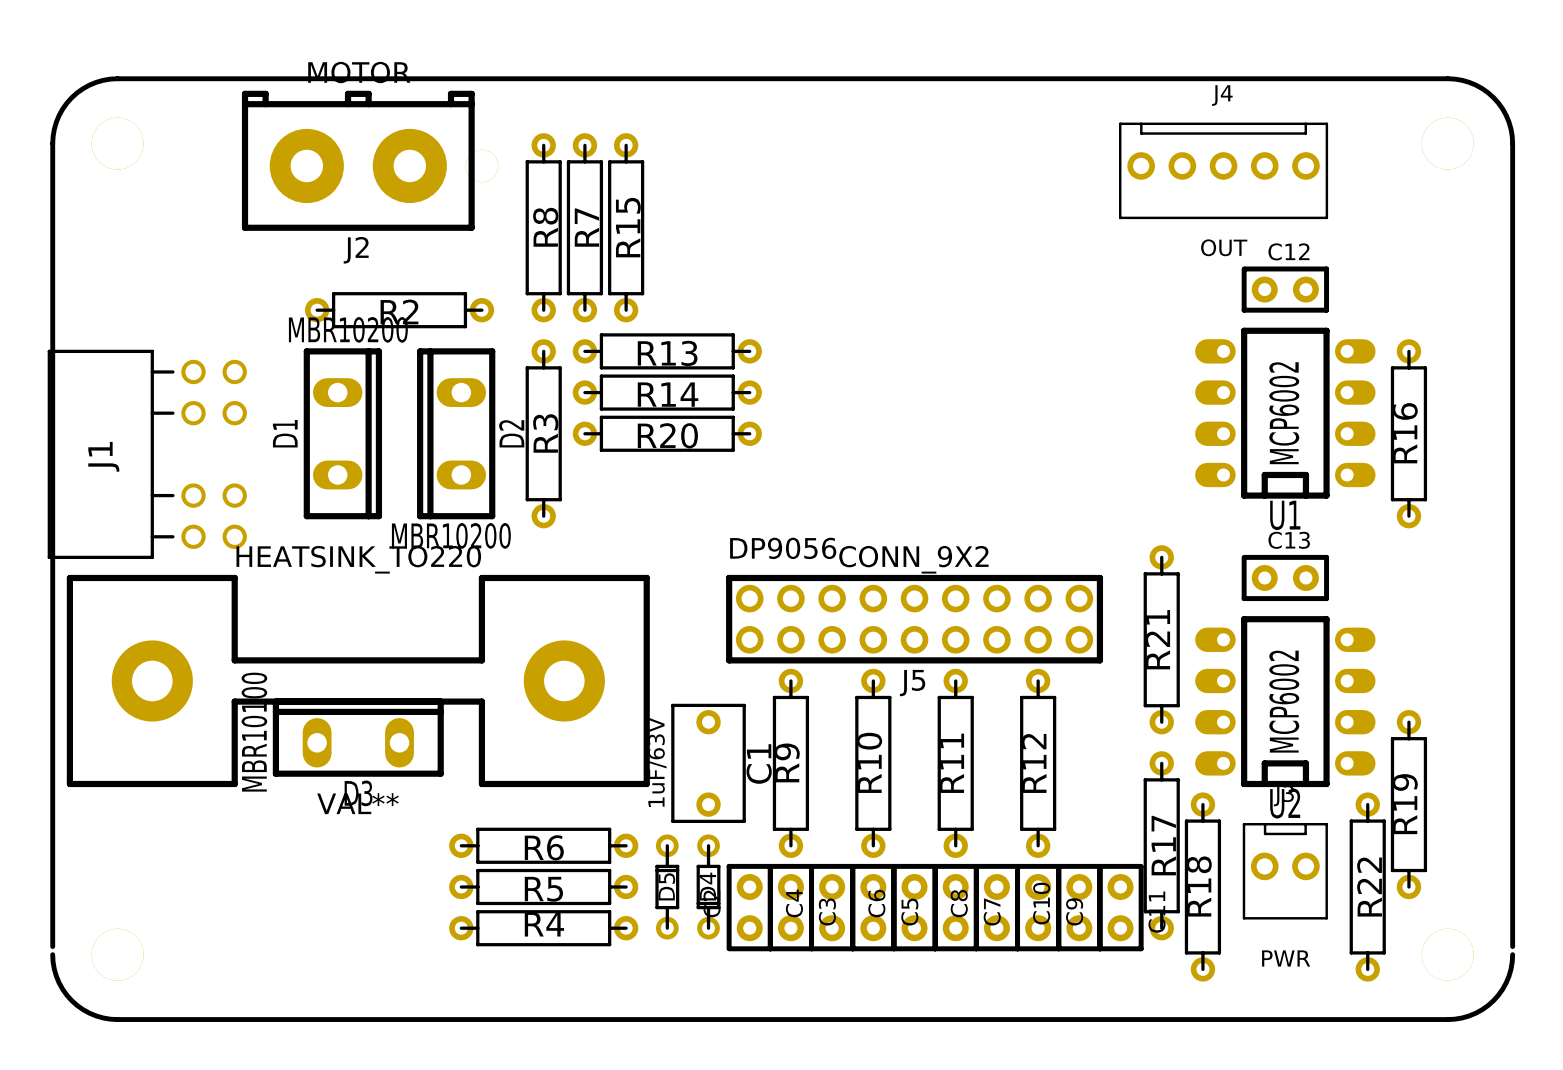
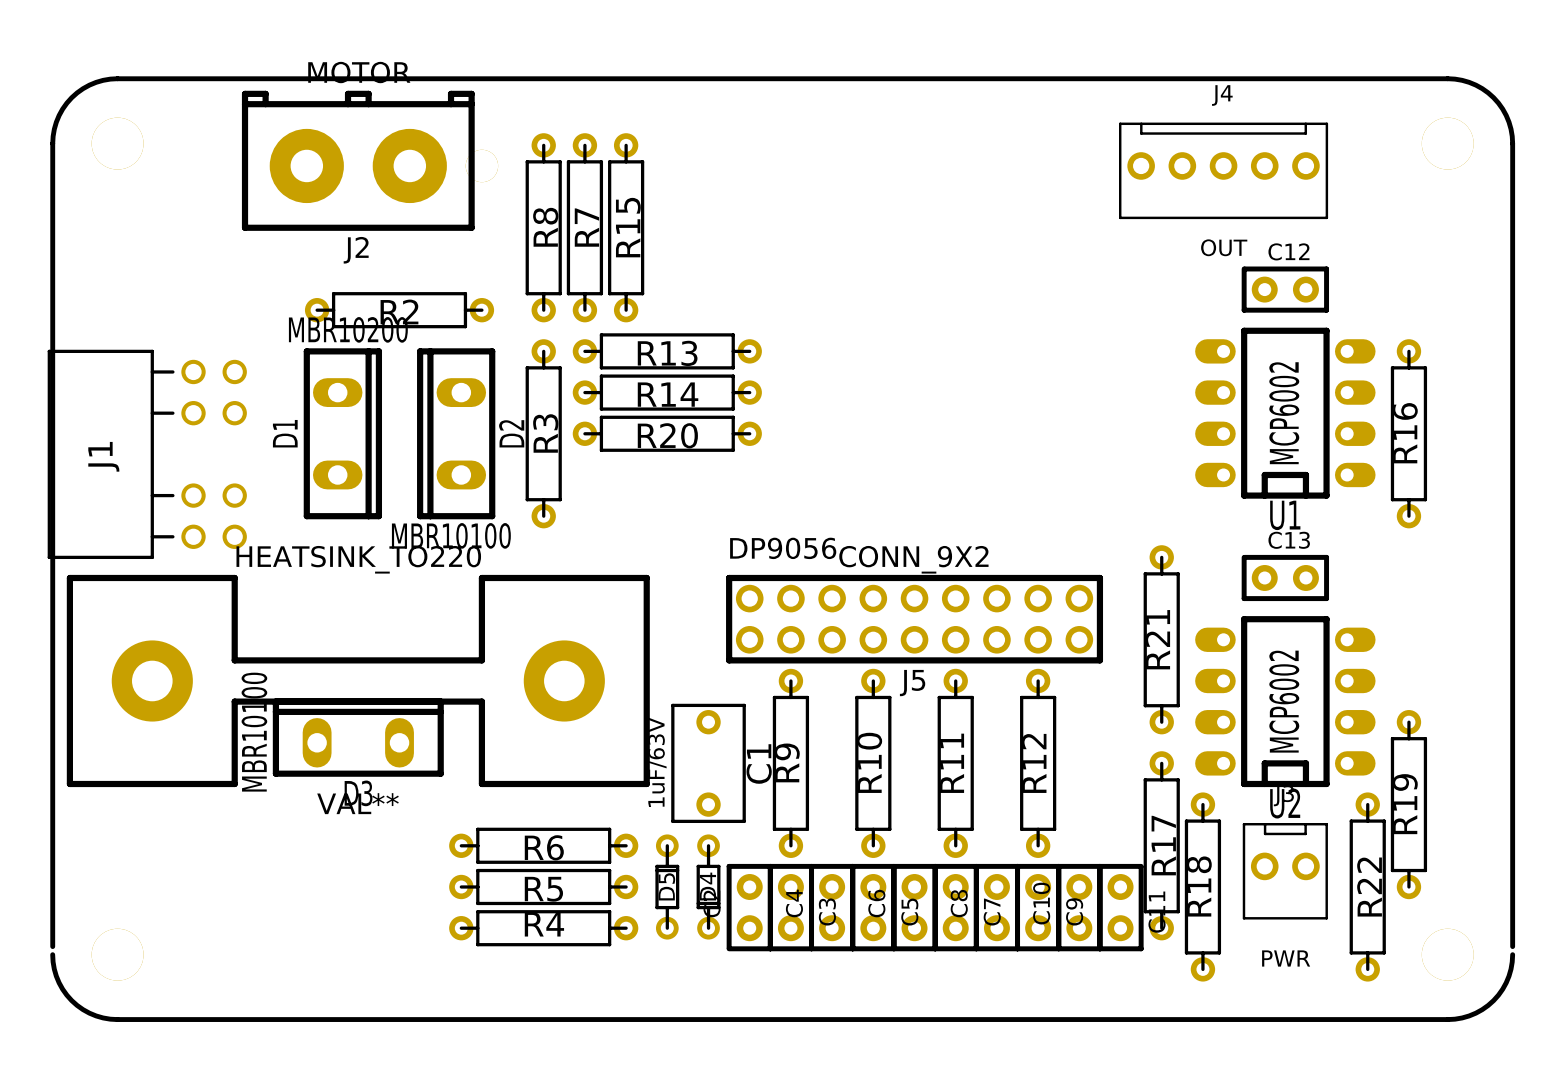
D2 value: MBR10200 (451, 535) -> MBR10100 (451, 535)

